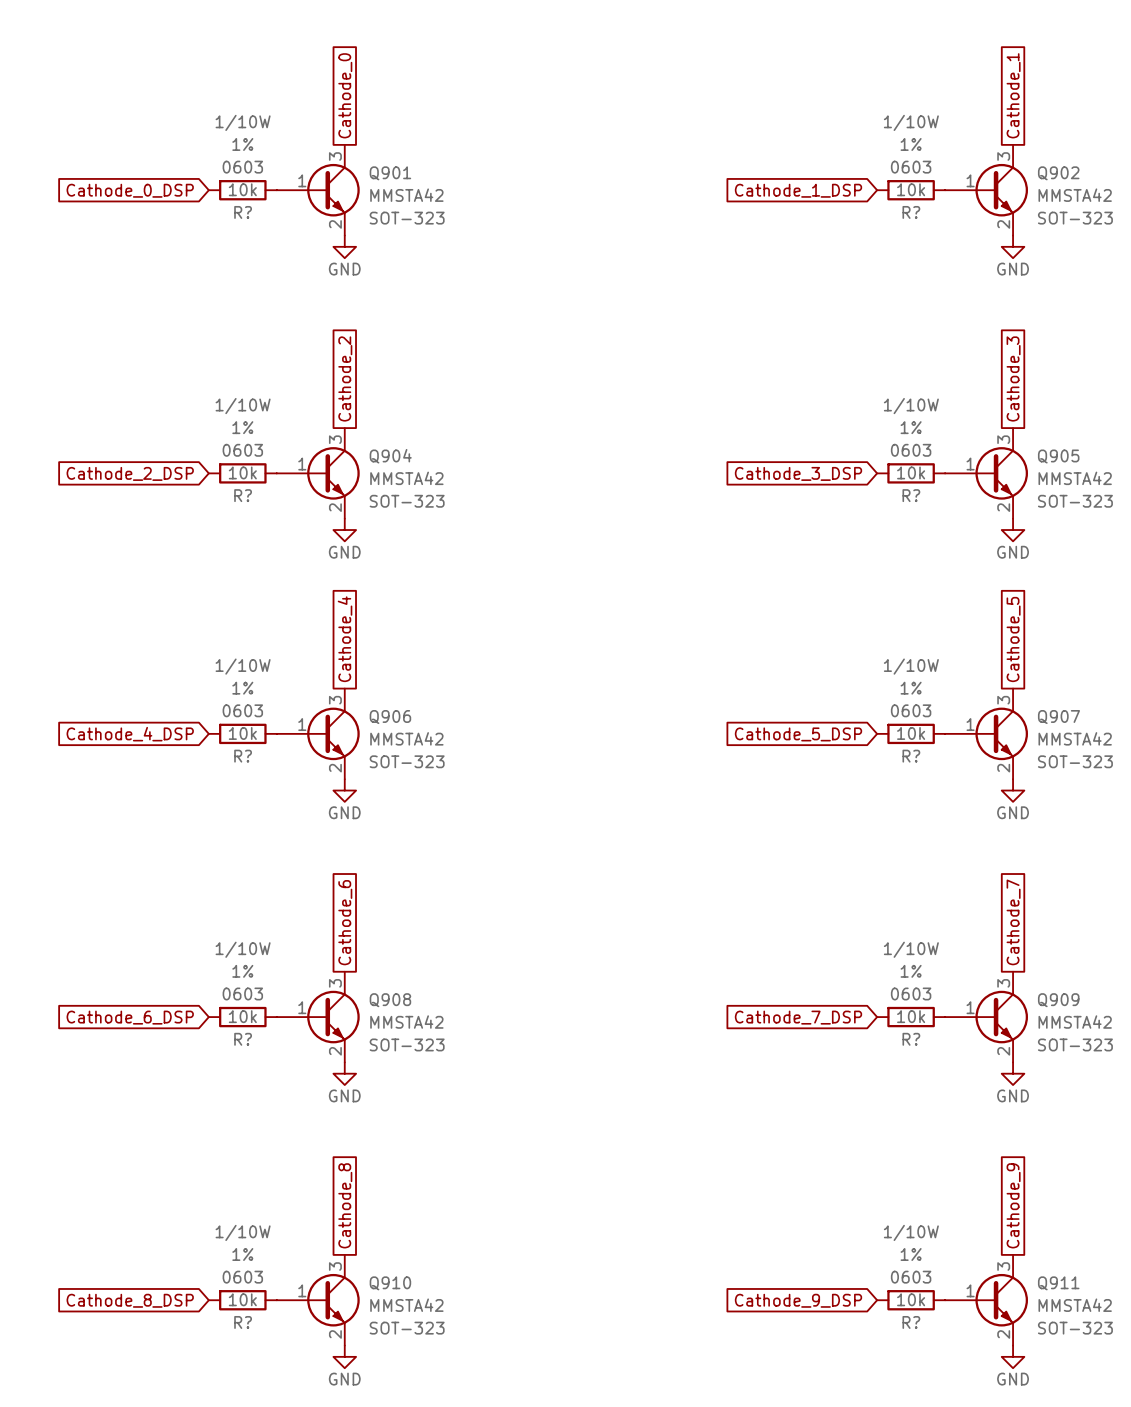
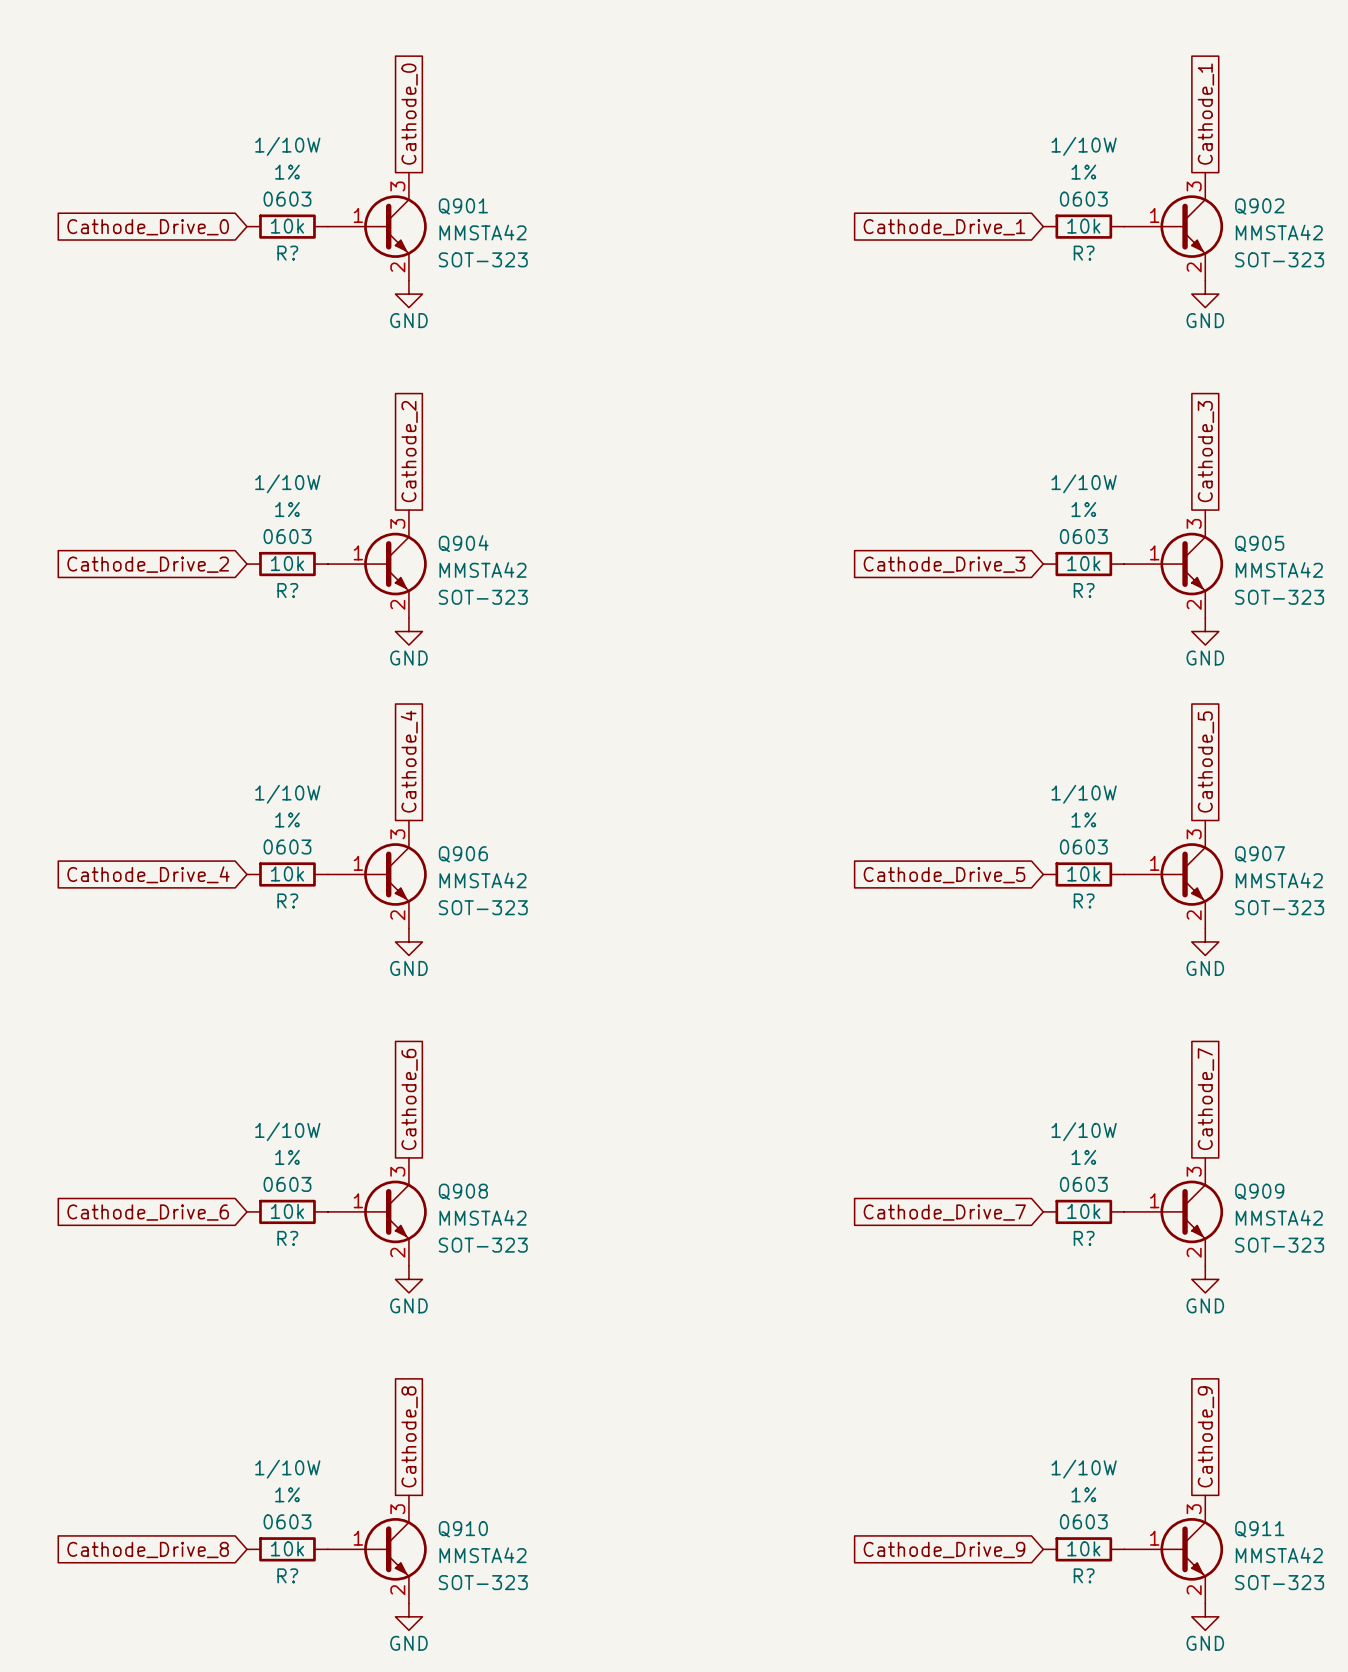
global label: Cathode_0_DSP (130, 190) -> Cathode_Drive_0 (148, 227)
global label: Cathode_1_DSP (798, 190) -> Cathode_Drive_1 (944, 227)
global label: Cathode_2_DSP (130, 473) -> Cathode_Drive_2 (148, 564)
global label: Cathode_3_DSP (798, 473) -> Cathode_Drive_3 (944, 564)
global label: Cathode_4_DSP (130, 734) -> Cathode_Drive_4 (148, 874)
global label: Cathode_5_DSP (798, 734) -> Cathode_Drive_5 (944, 875)
global label: Cathode_6_DSP (130, 1017) -> Cathode_Drive_6 (148, 1212)
global label: Cathode_7_DSP (798, 1017) -> Cathode_Drive_7 (944, 1212)
global label: Cathode_8_DSP (130, 1300) -> Cathode_Drive_8 (148, 1549)
global label: Cathode_9_DSP (798, 1300) -> Cathode_Drive_9 (944, 1549)

